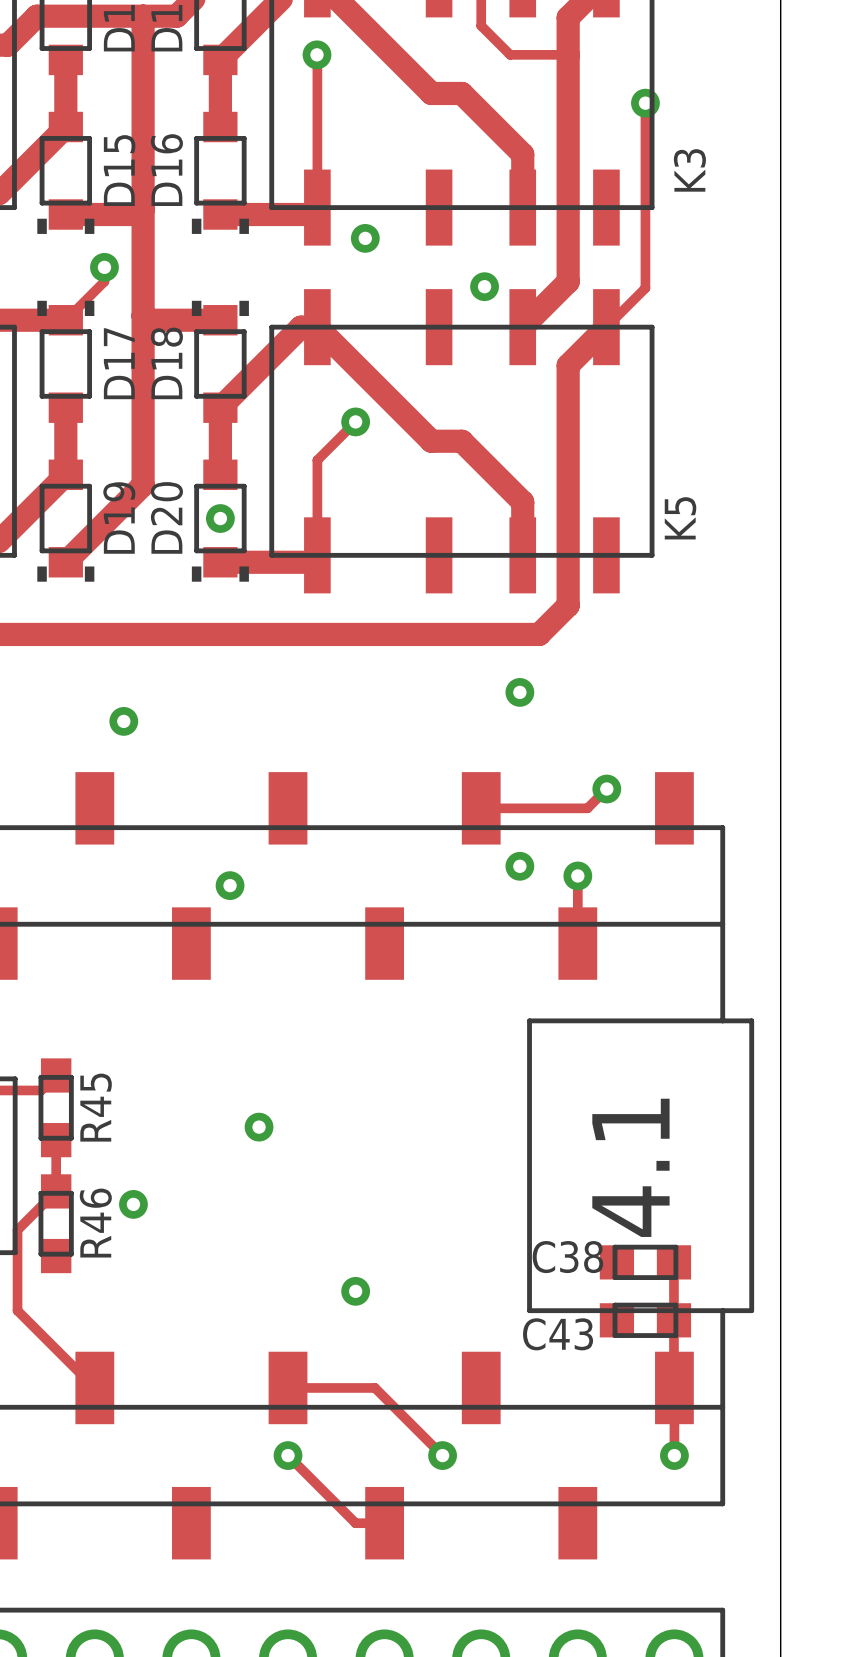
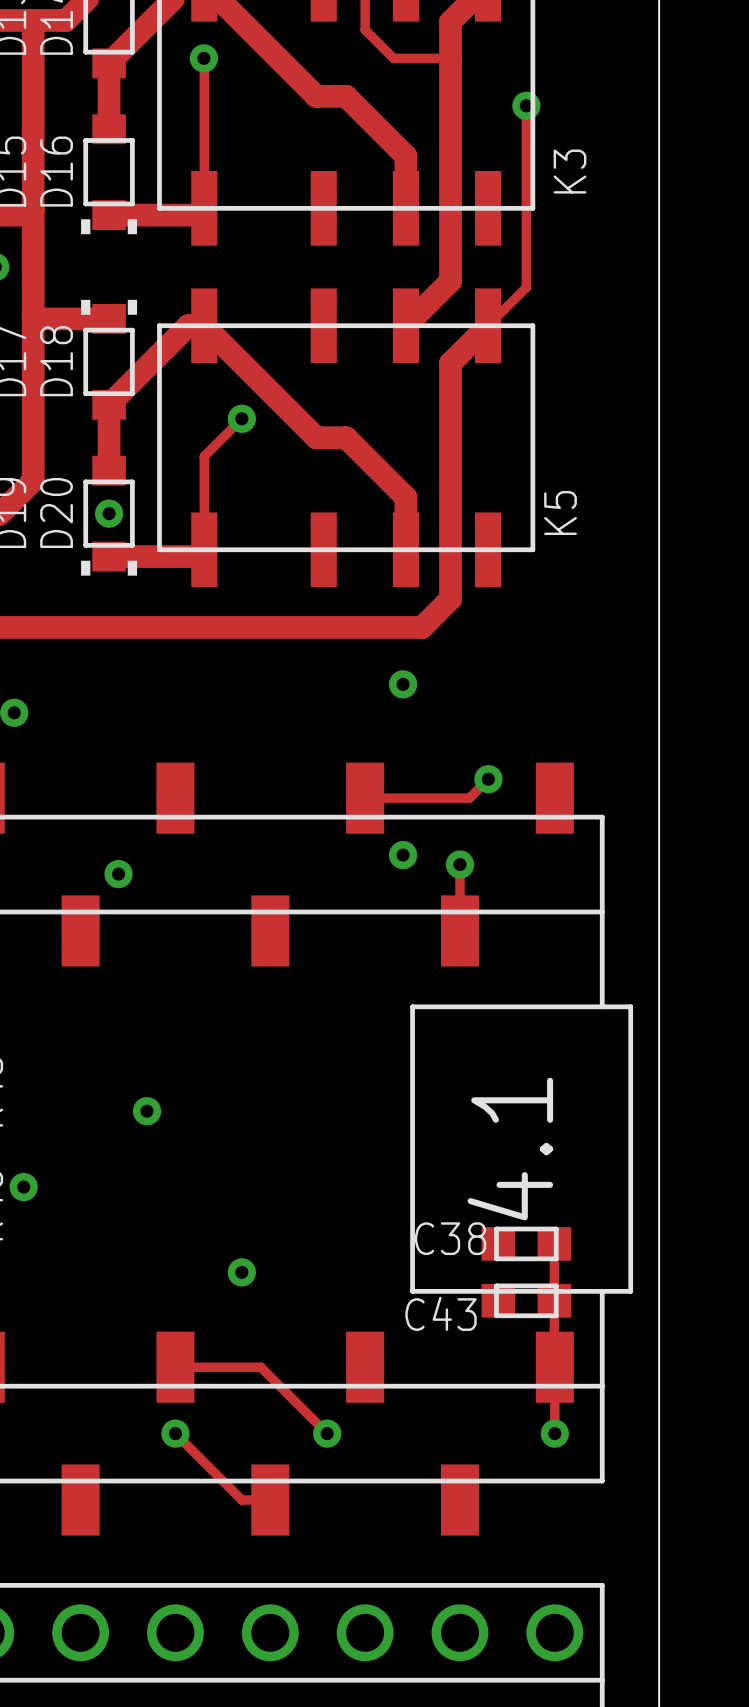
via: (365, 238) -> none
via: (484, 286) -> none

